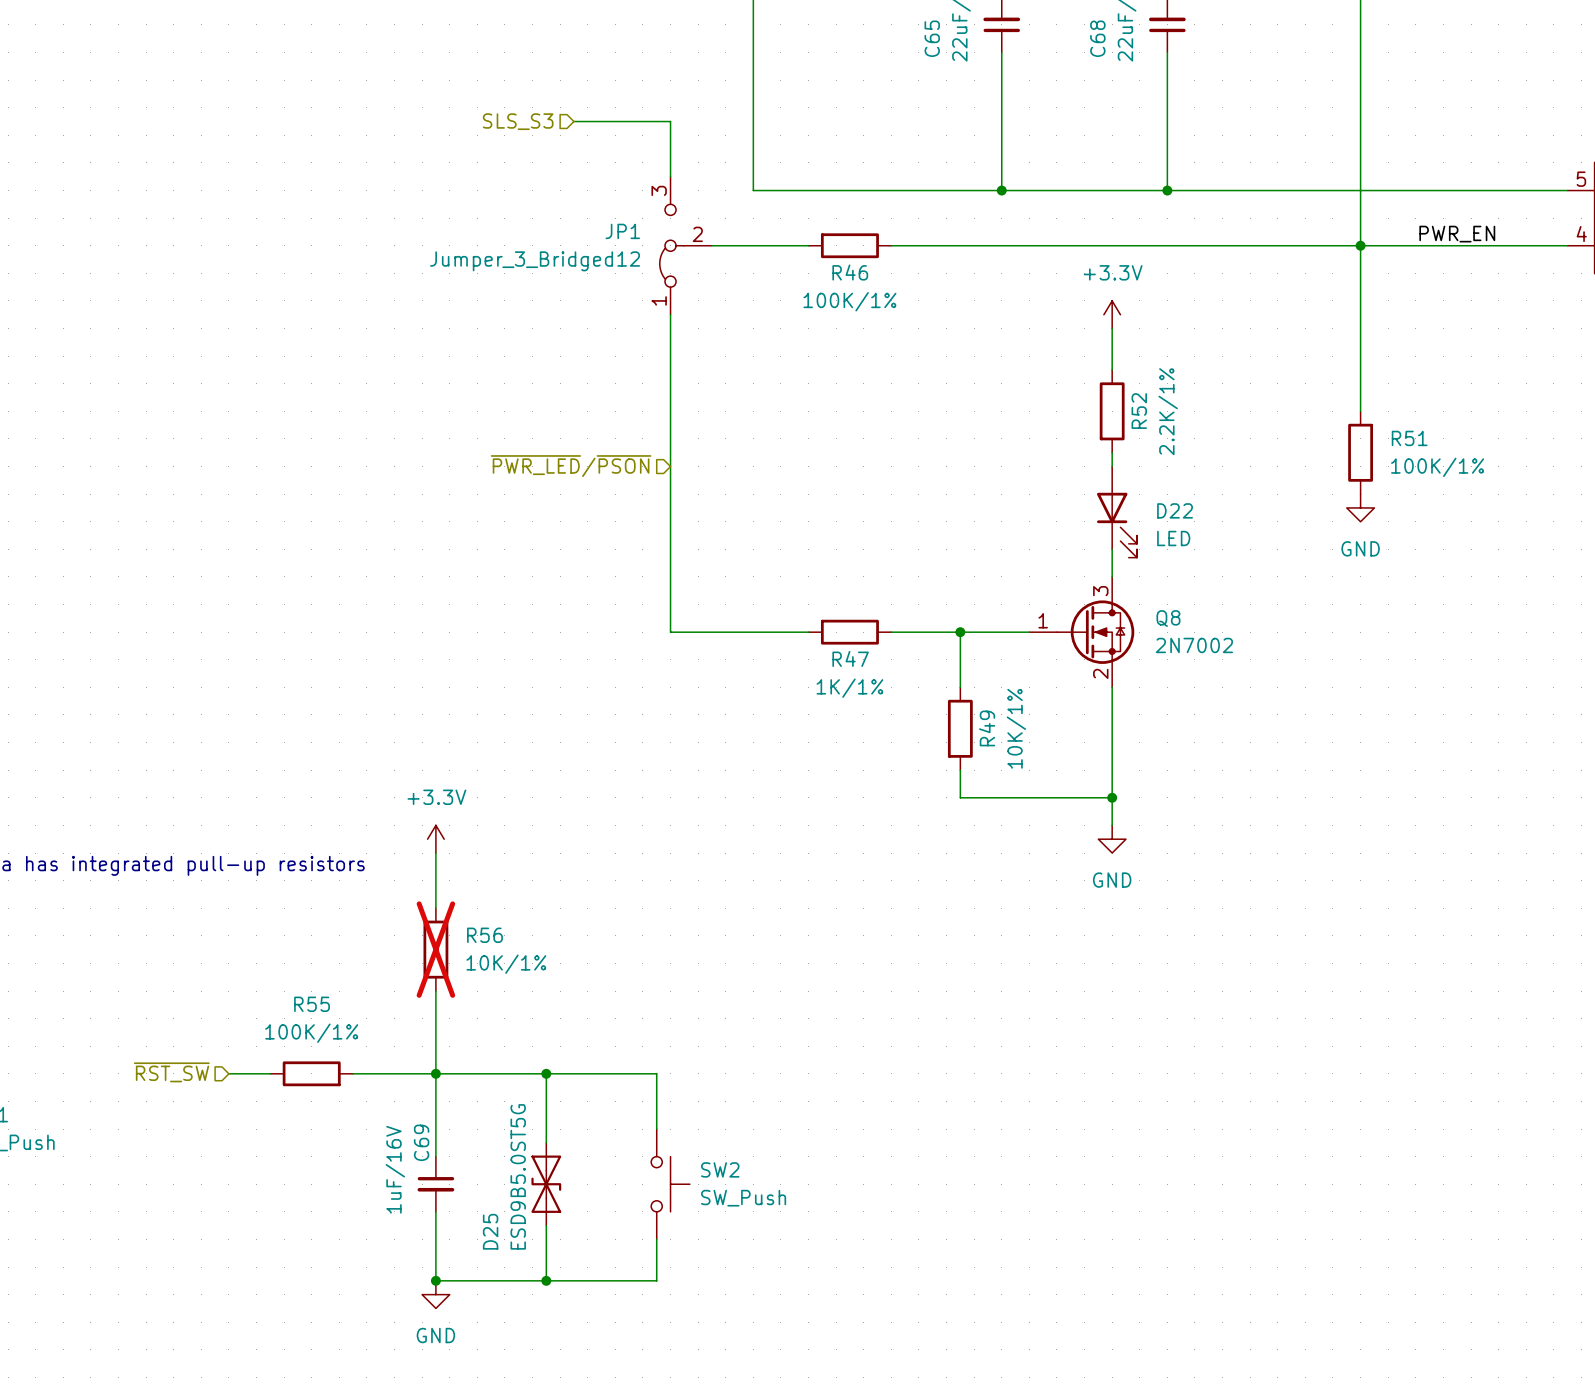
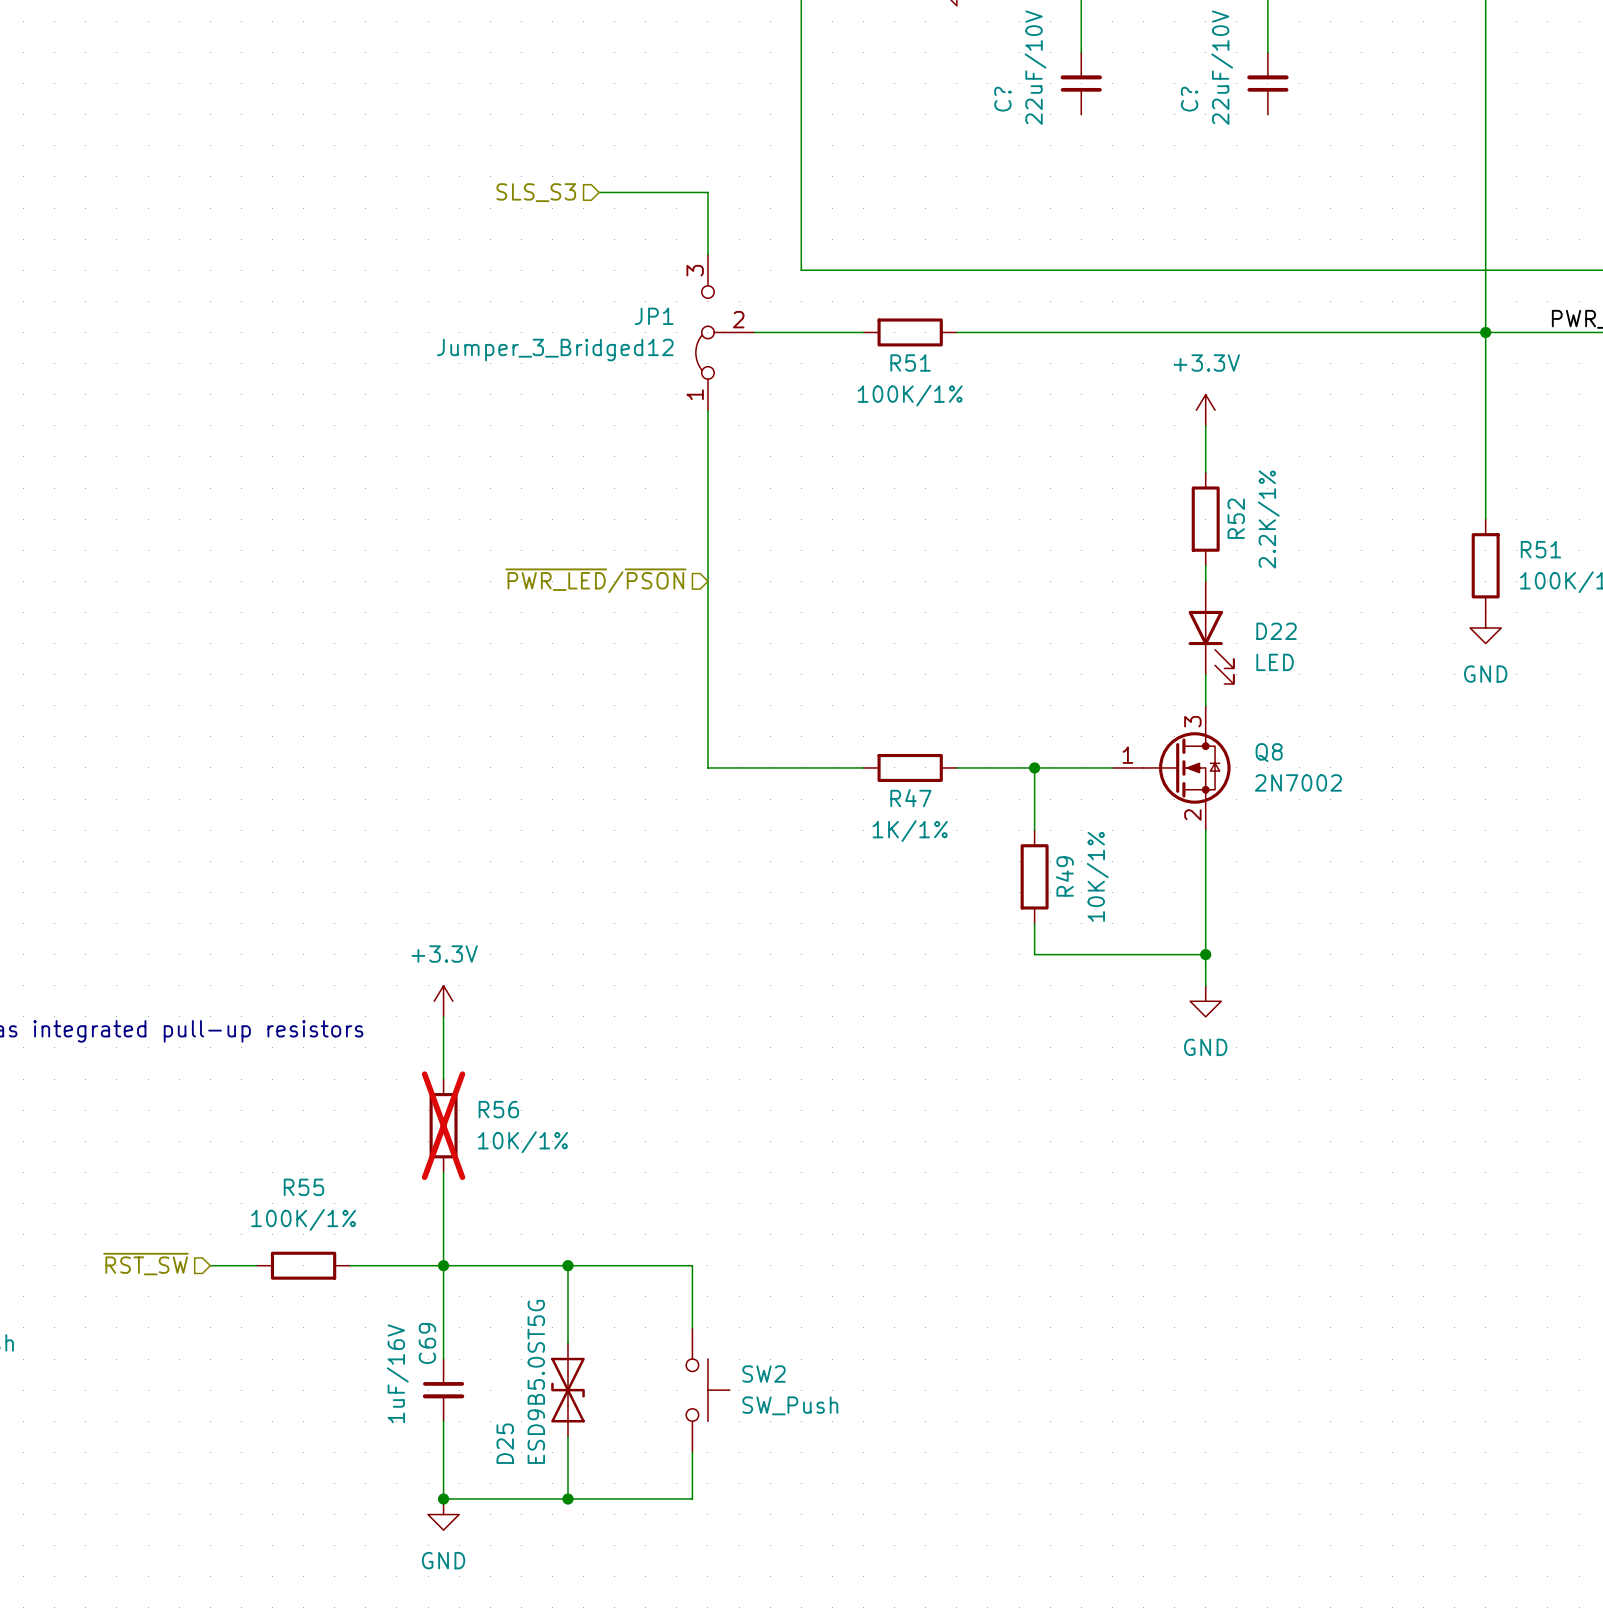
C65 name: C65 (932, 38) -> C? (1002, 99)
C68 name: C68 (1097, 38) -> C? (1189, 99)
wire: (1001, 52) (1001, 190) -> none
wire: (1167, 52) (1167, 190) -> none
junction: (1001, 190) -> none
junction: (1167, 190) -> none
R46 name: R46 (850, 272) -> R51 (910, 362)

